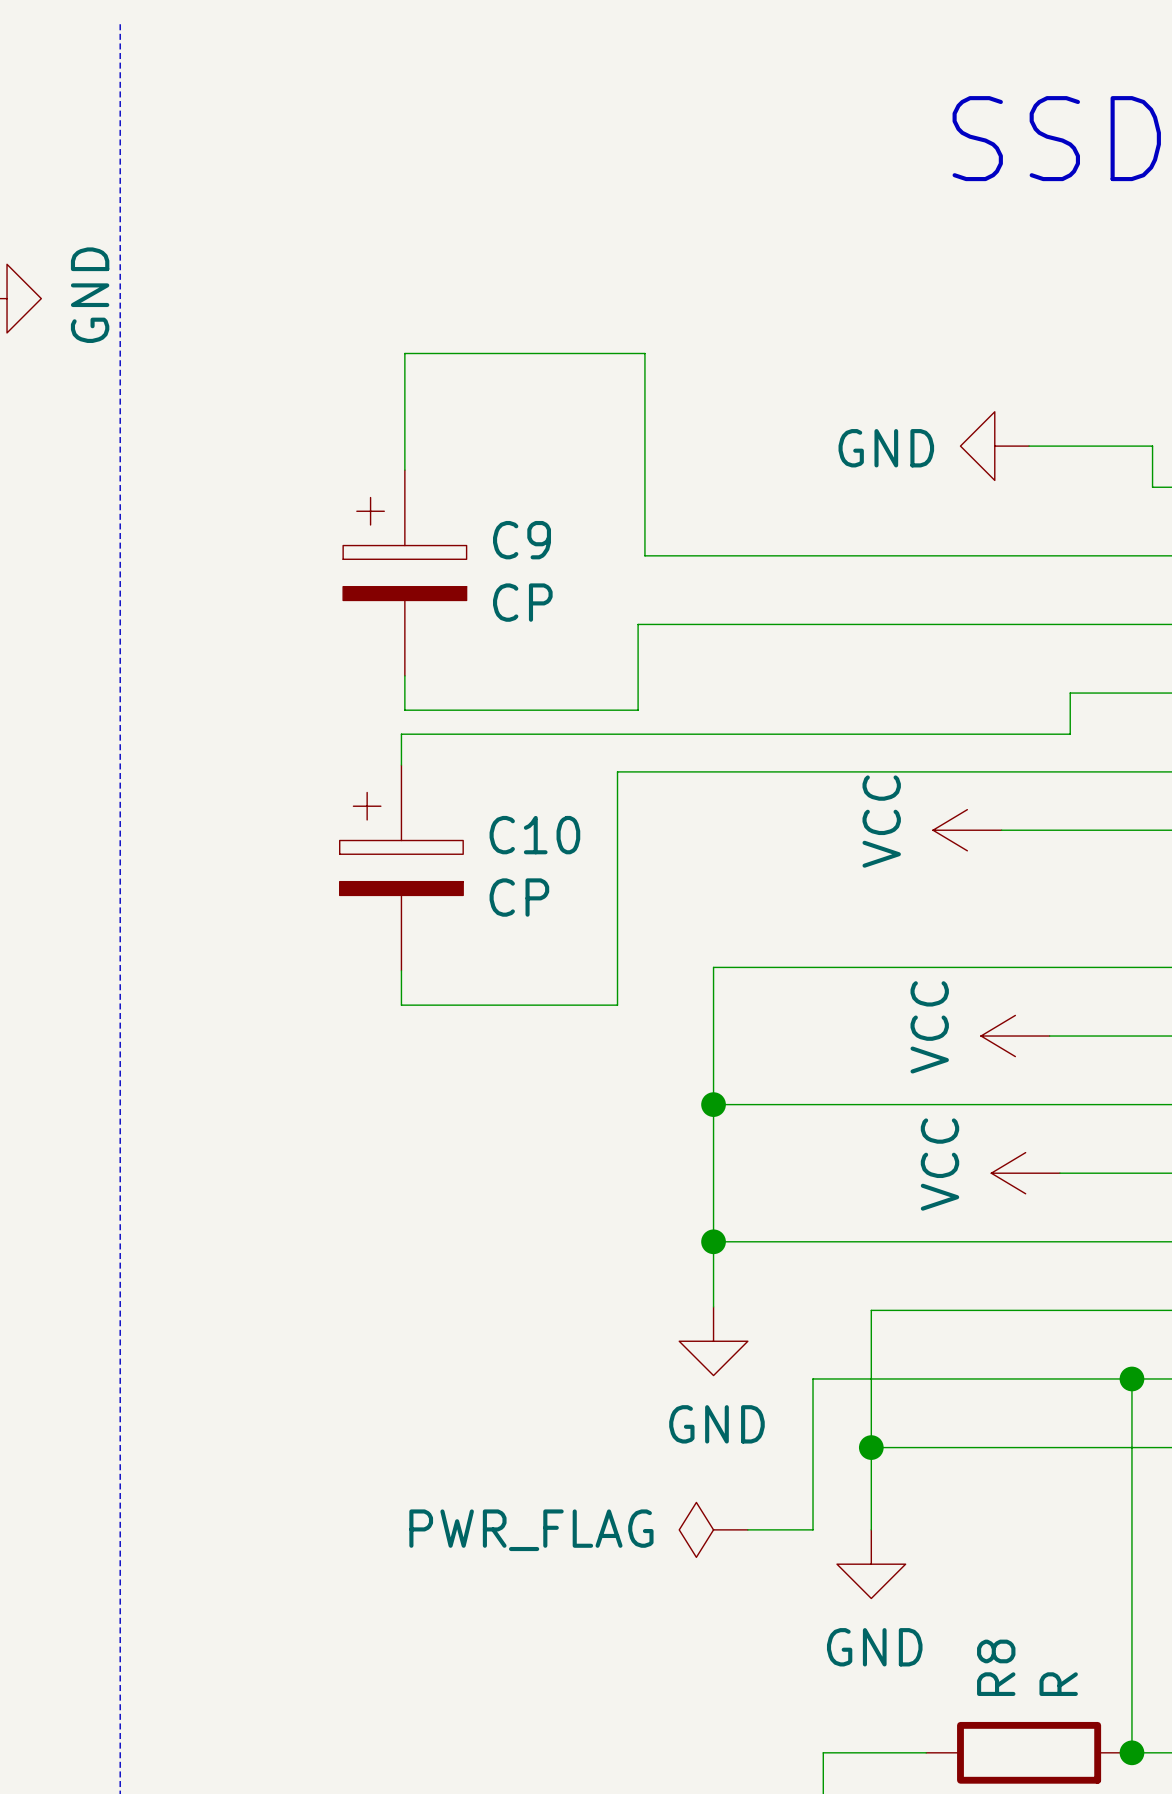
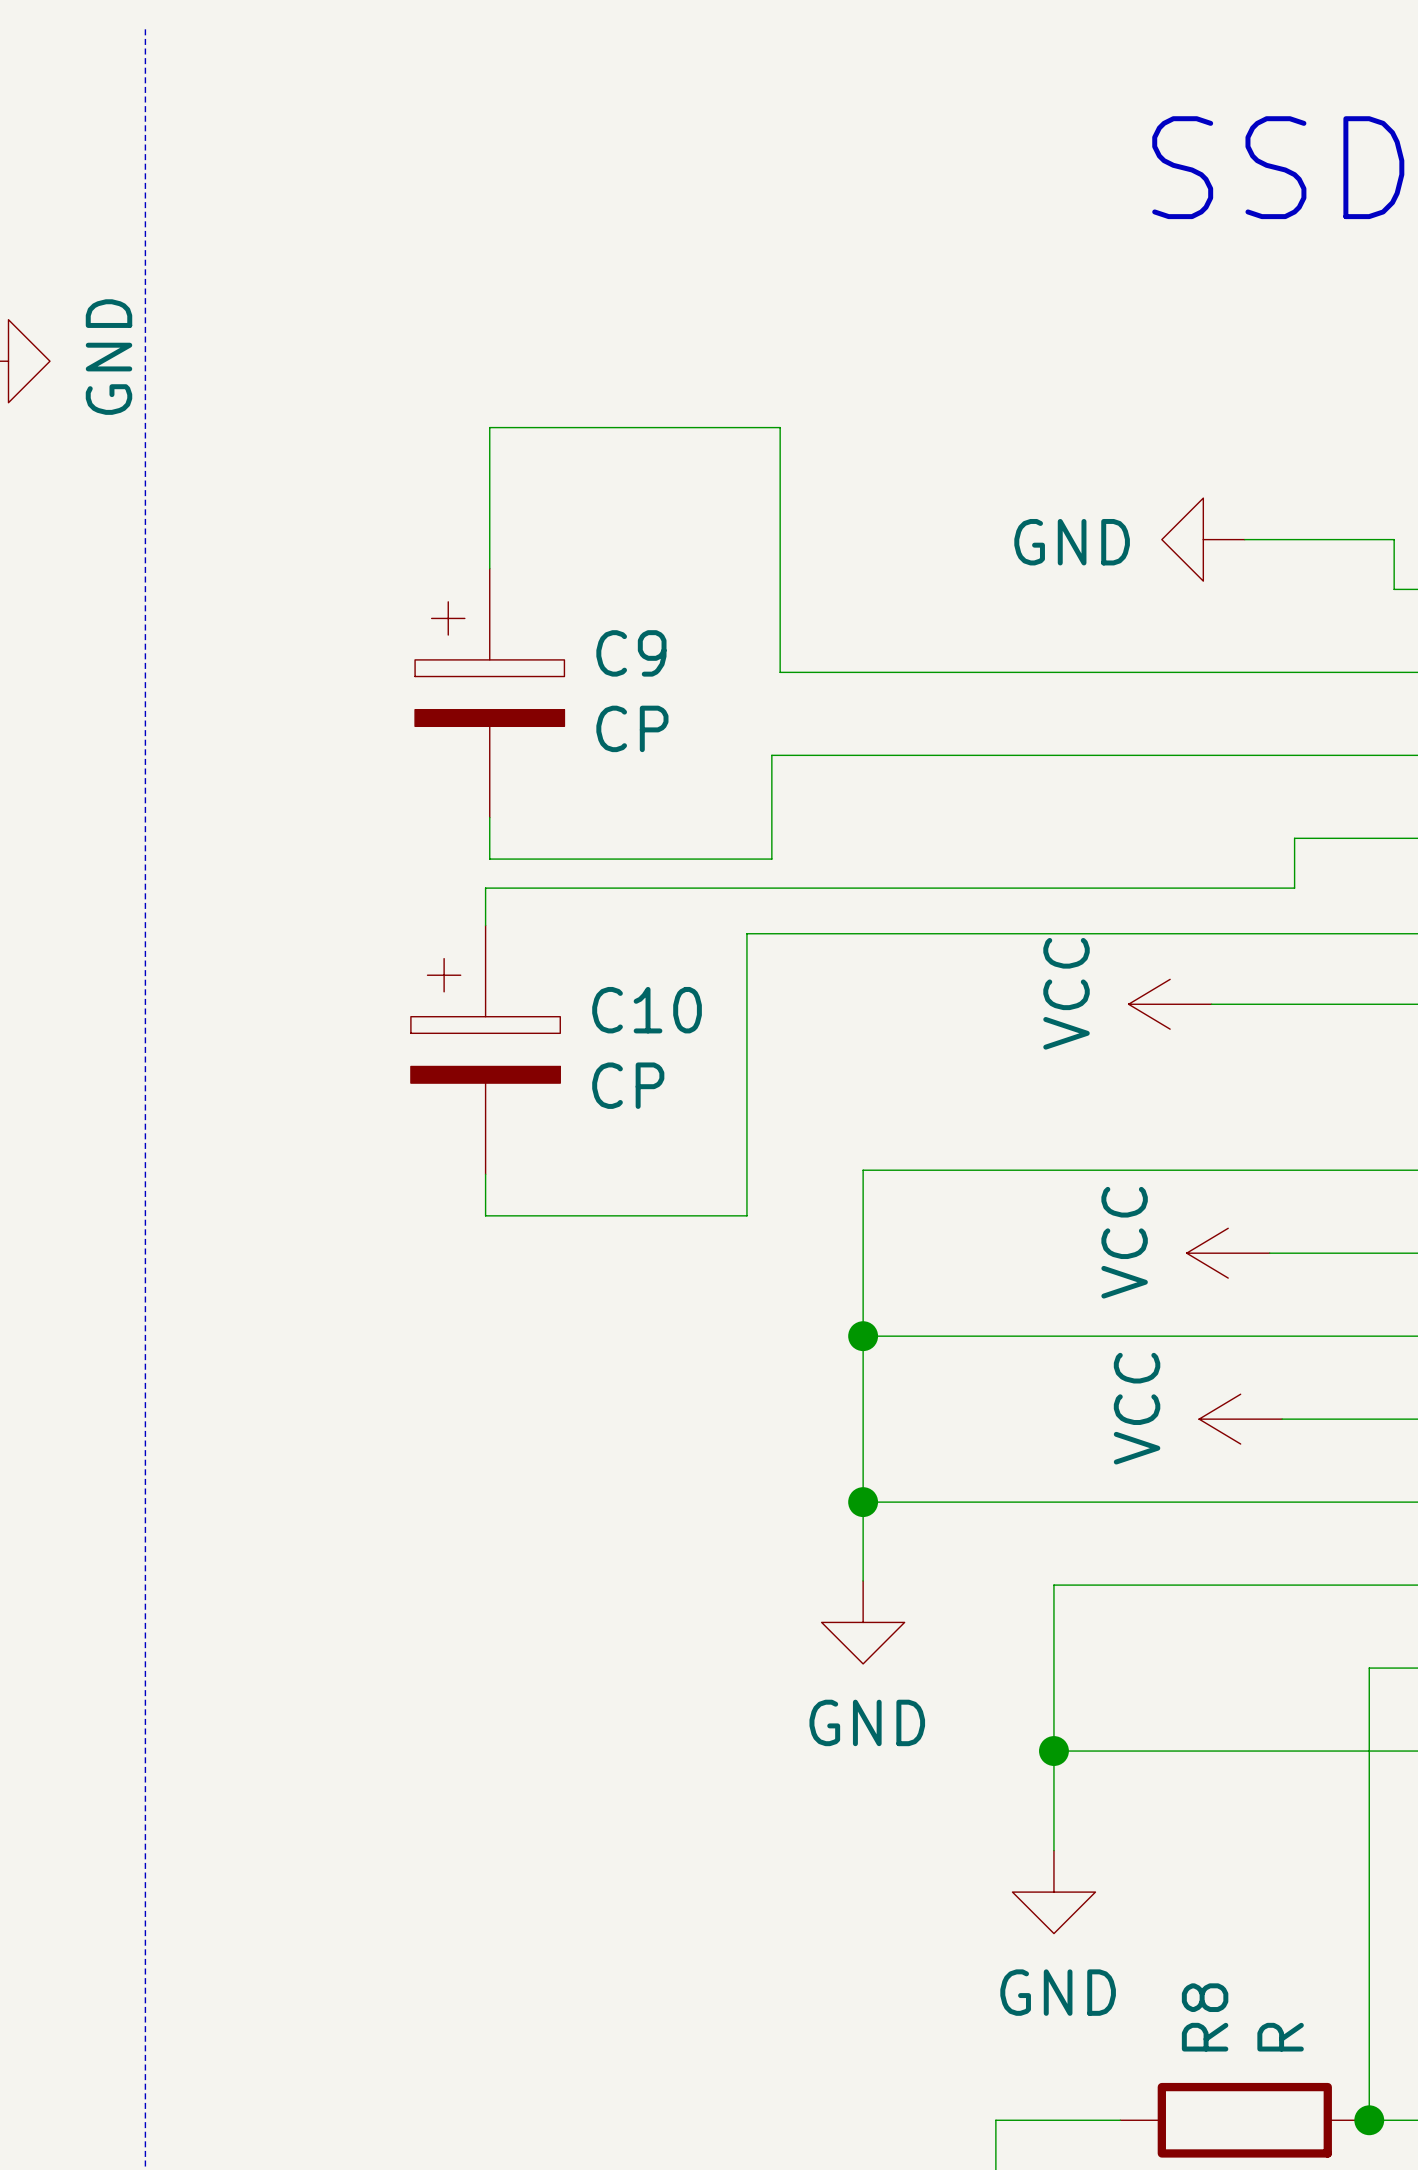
wire: (1131, 1378) (813, 1378) (813, 1529) (747, 1529) -> none
junction: (1131, 1378) -> none
power symbol: PWR_FLAG (713, 1529) -> none

